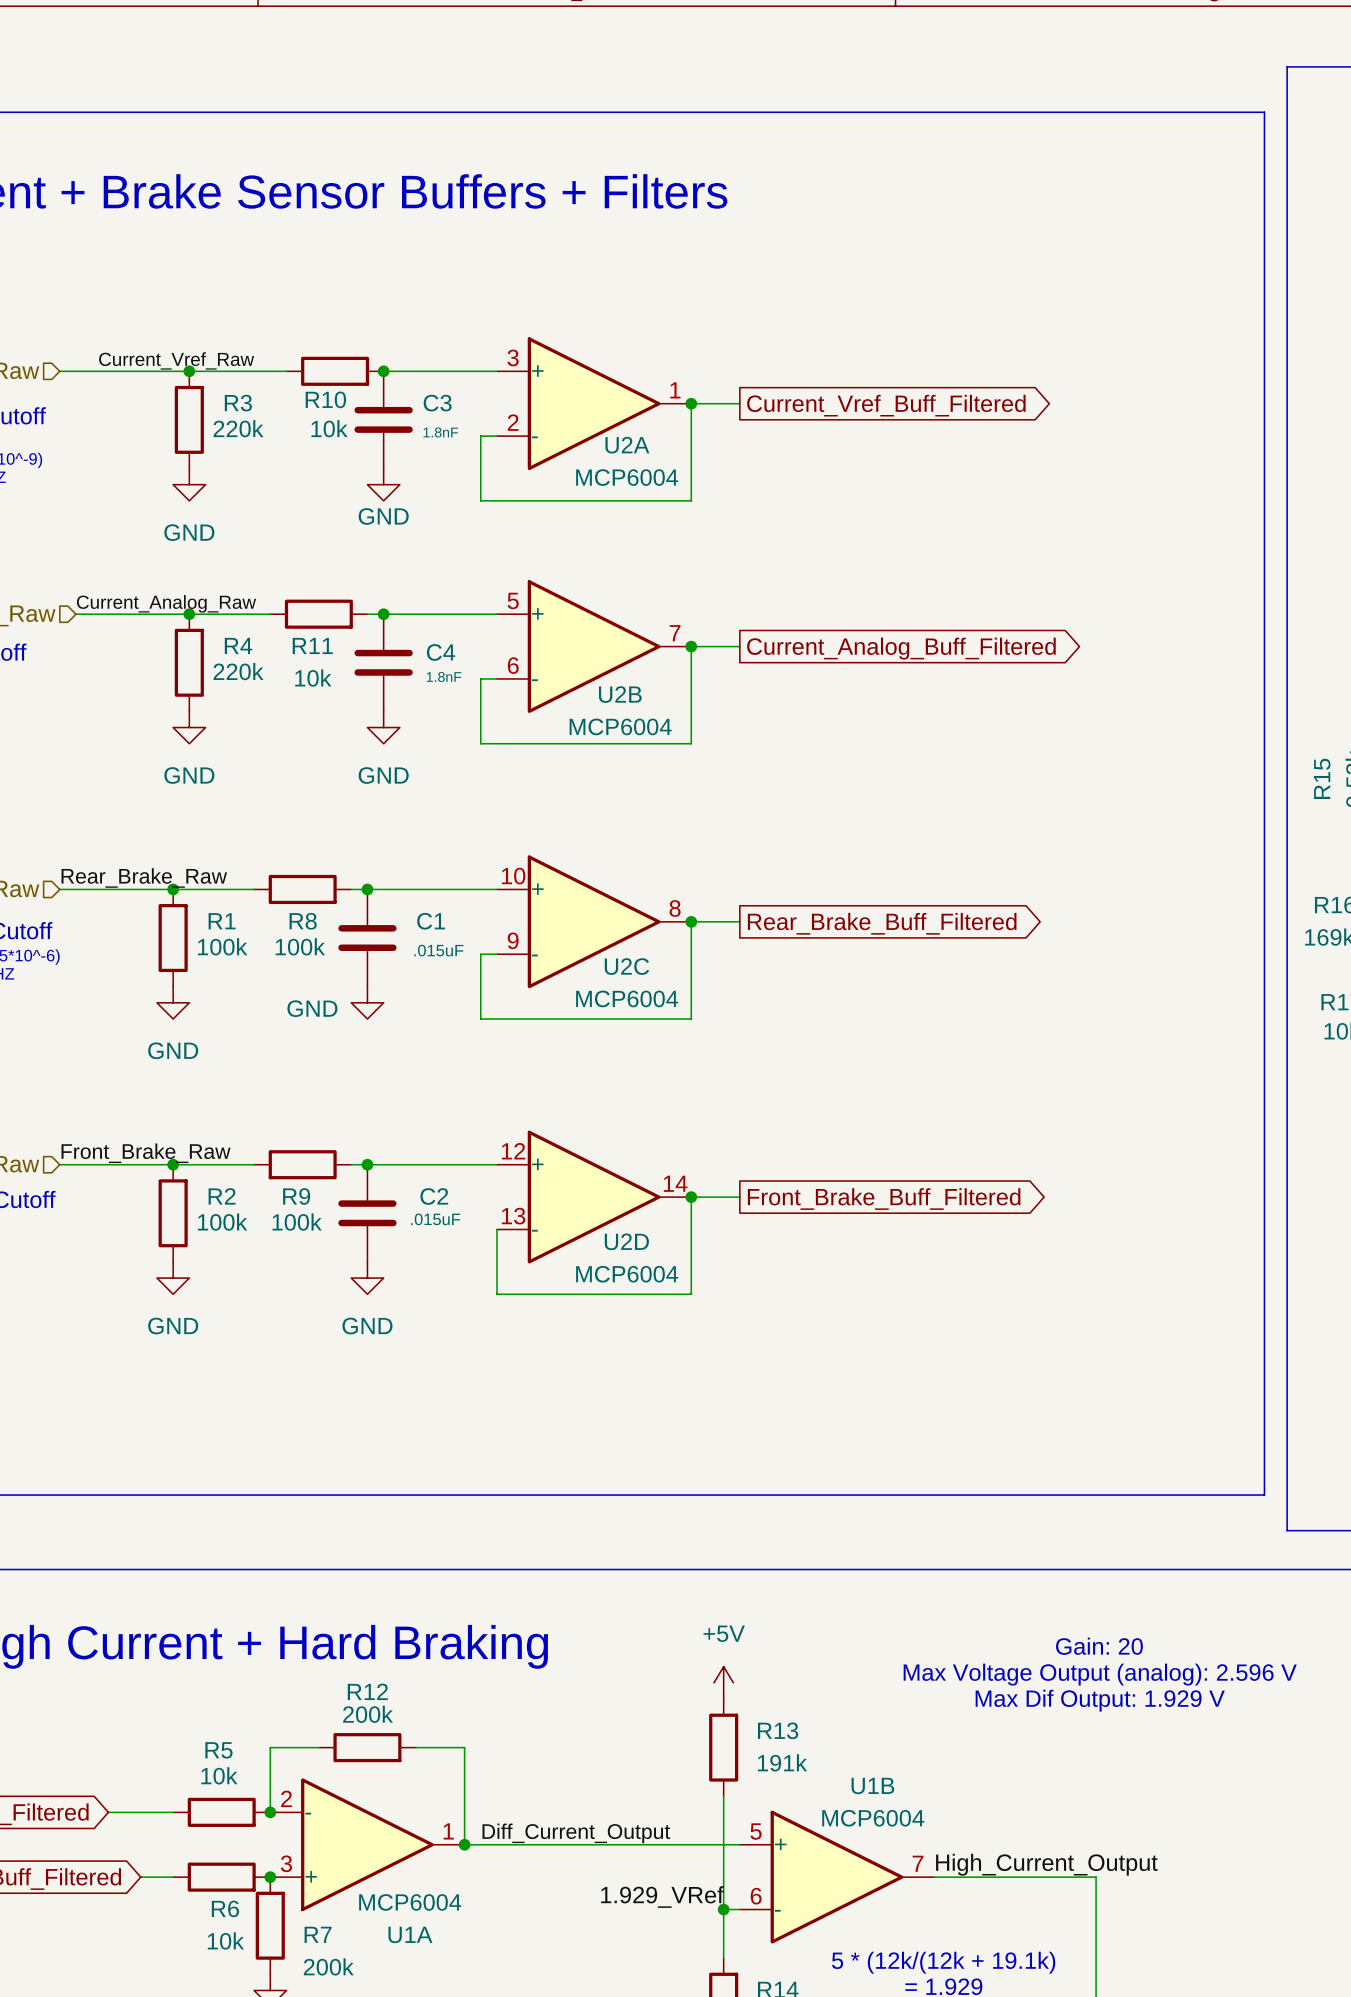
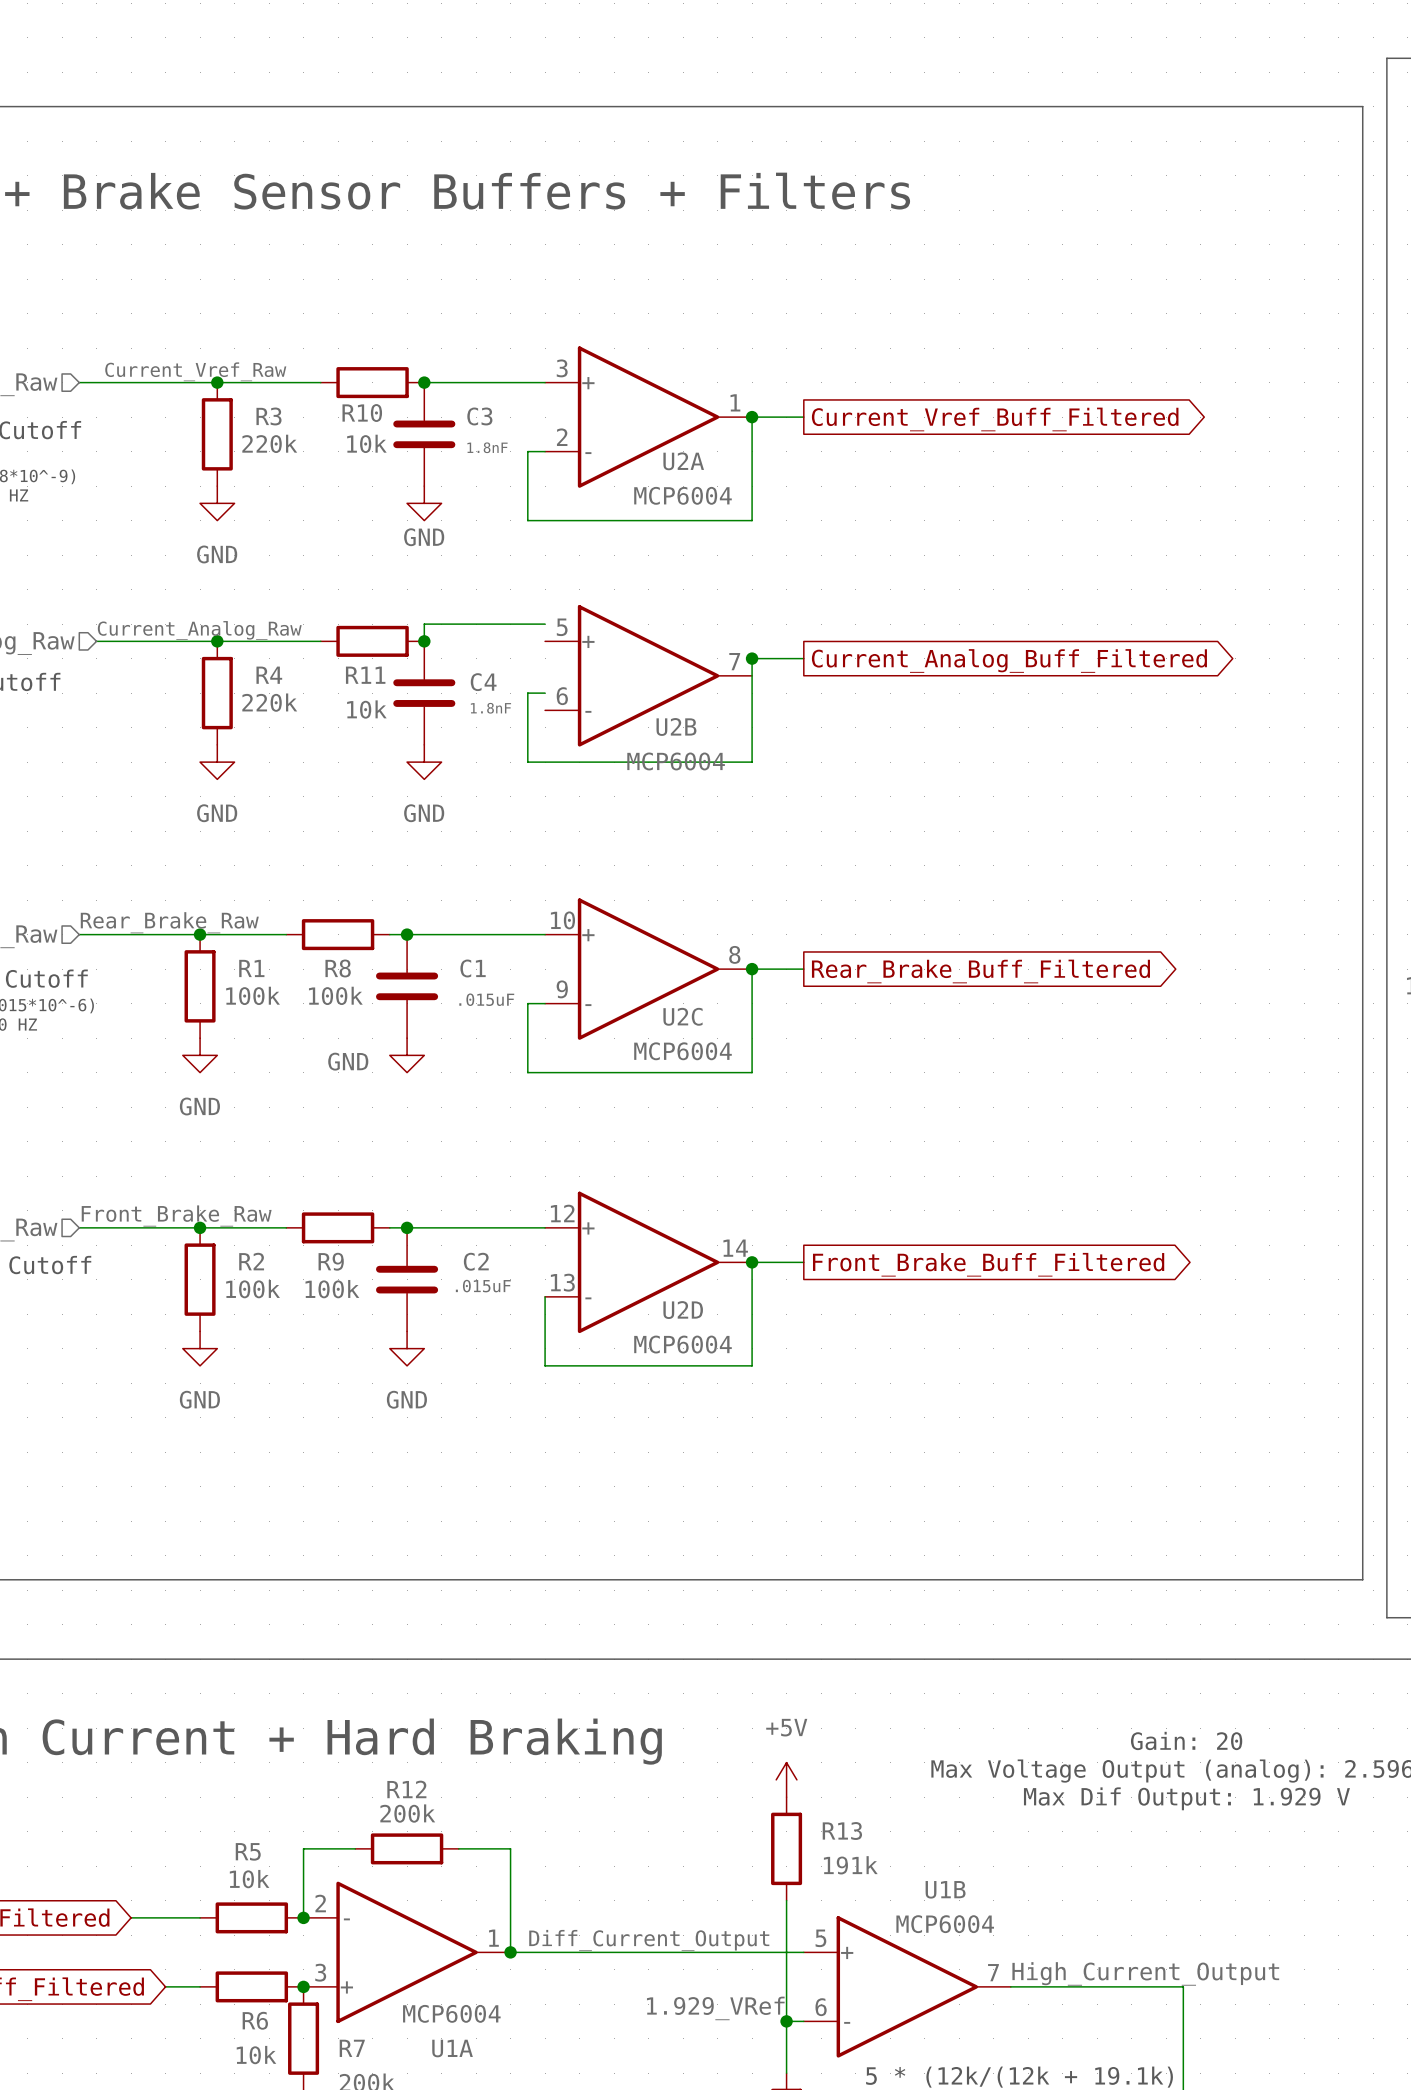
wire: none -> (545, 624) (424, 624) (424, 641)
R11 position: (318, 614) -> (372, 641)
wire: (367, 614) (496, 614) -> none
wire: (691, 646) (739, 646) -> (752, 675) (752, 658) (803, 658)
junction position: (691, 646) -> (752, 658)
global label position: Current_Analog_Buff_Filtered (901, 648) -> Current_Analog_Buff_Filtered (1009, 660)
wire: (480, 678) (496, 678) -> (527, 710) (527, 693) (545, 693)
wire: (480, 727) (480, 743) (691, 743) (691, 727) -> (527, 762) (752, 762)

